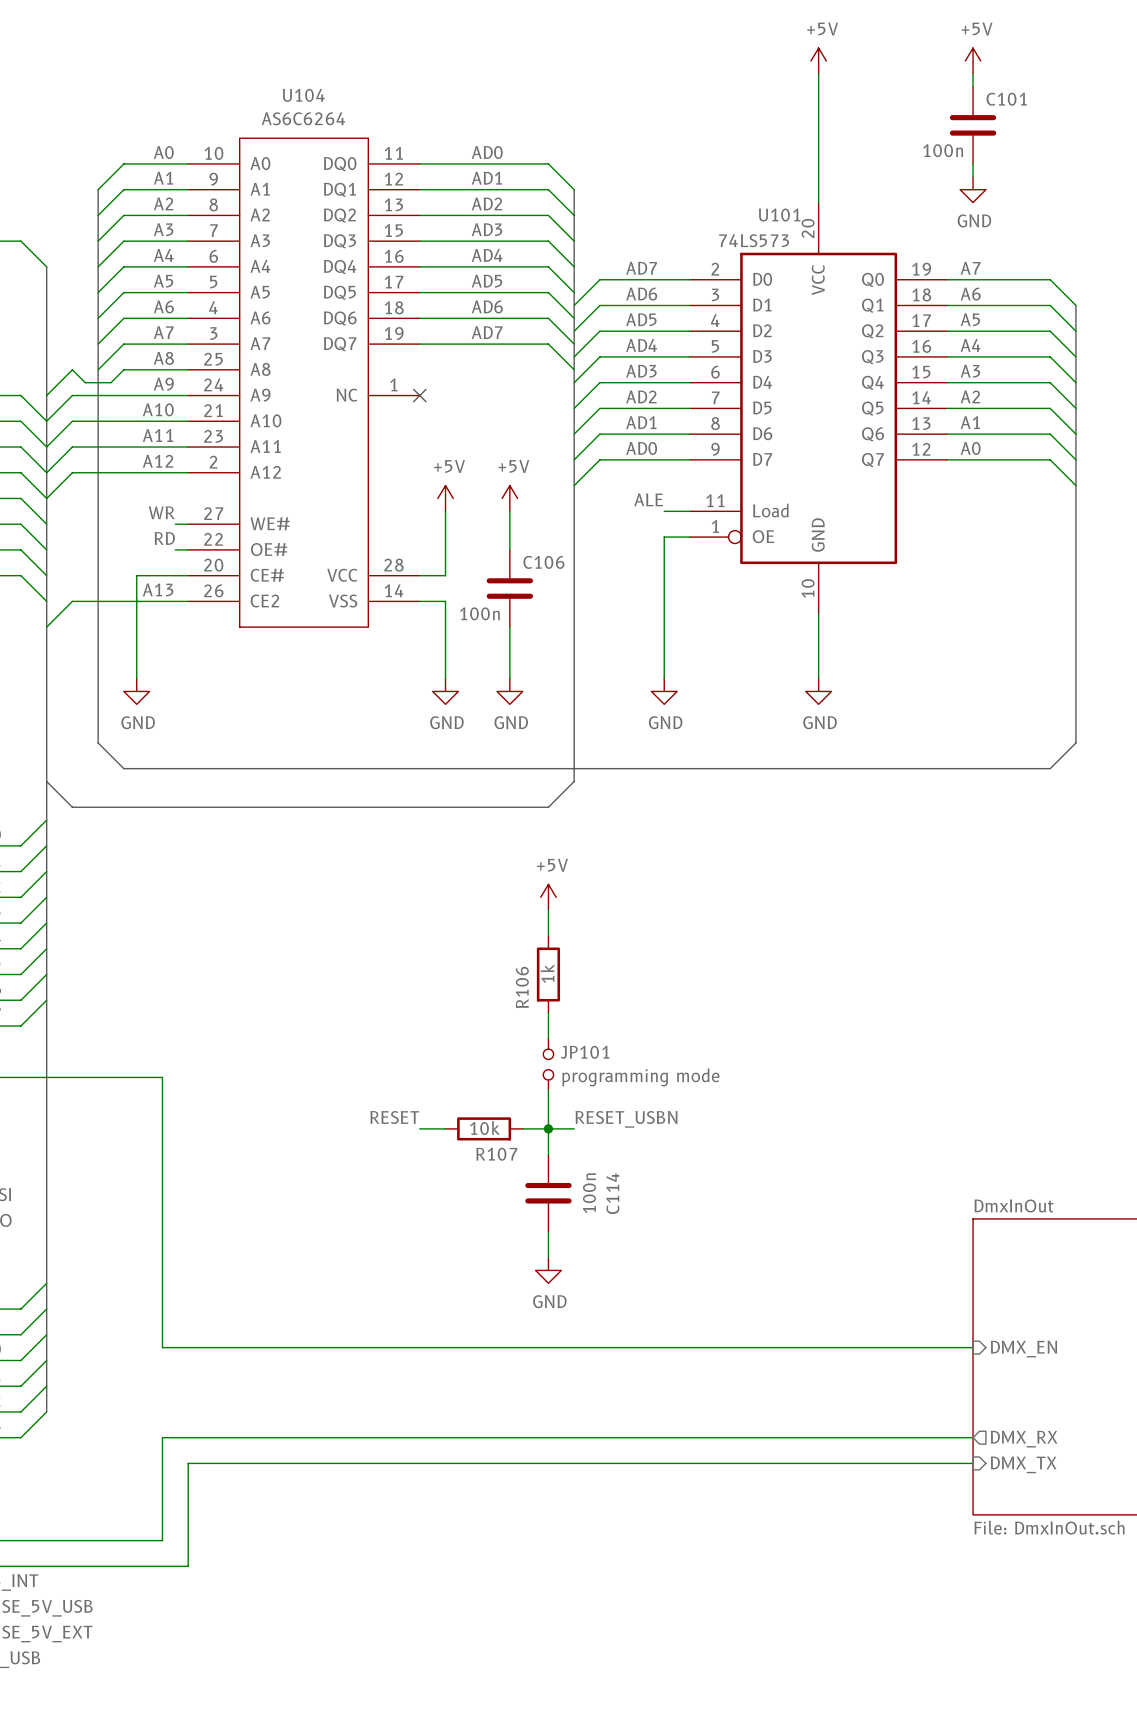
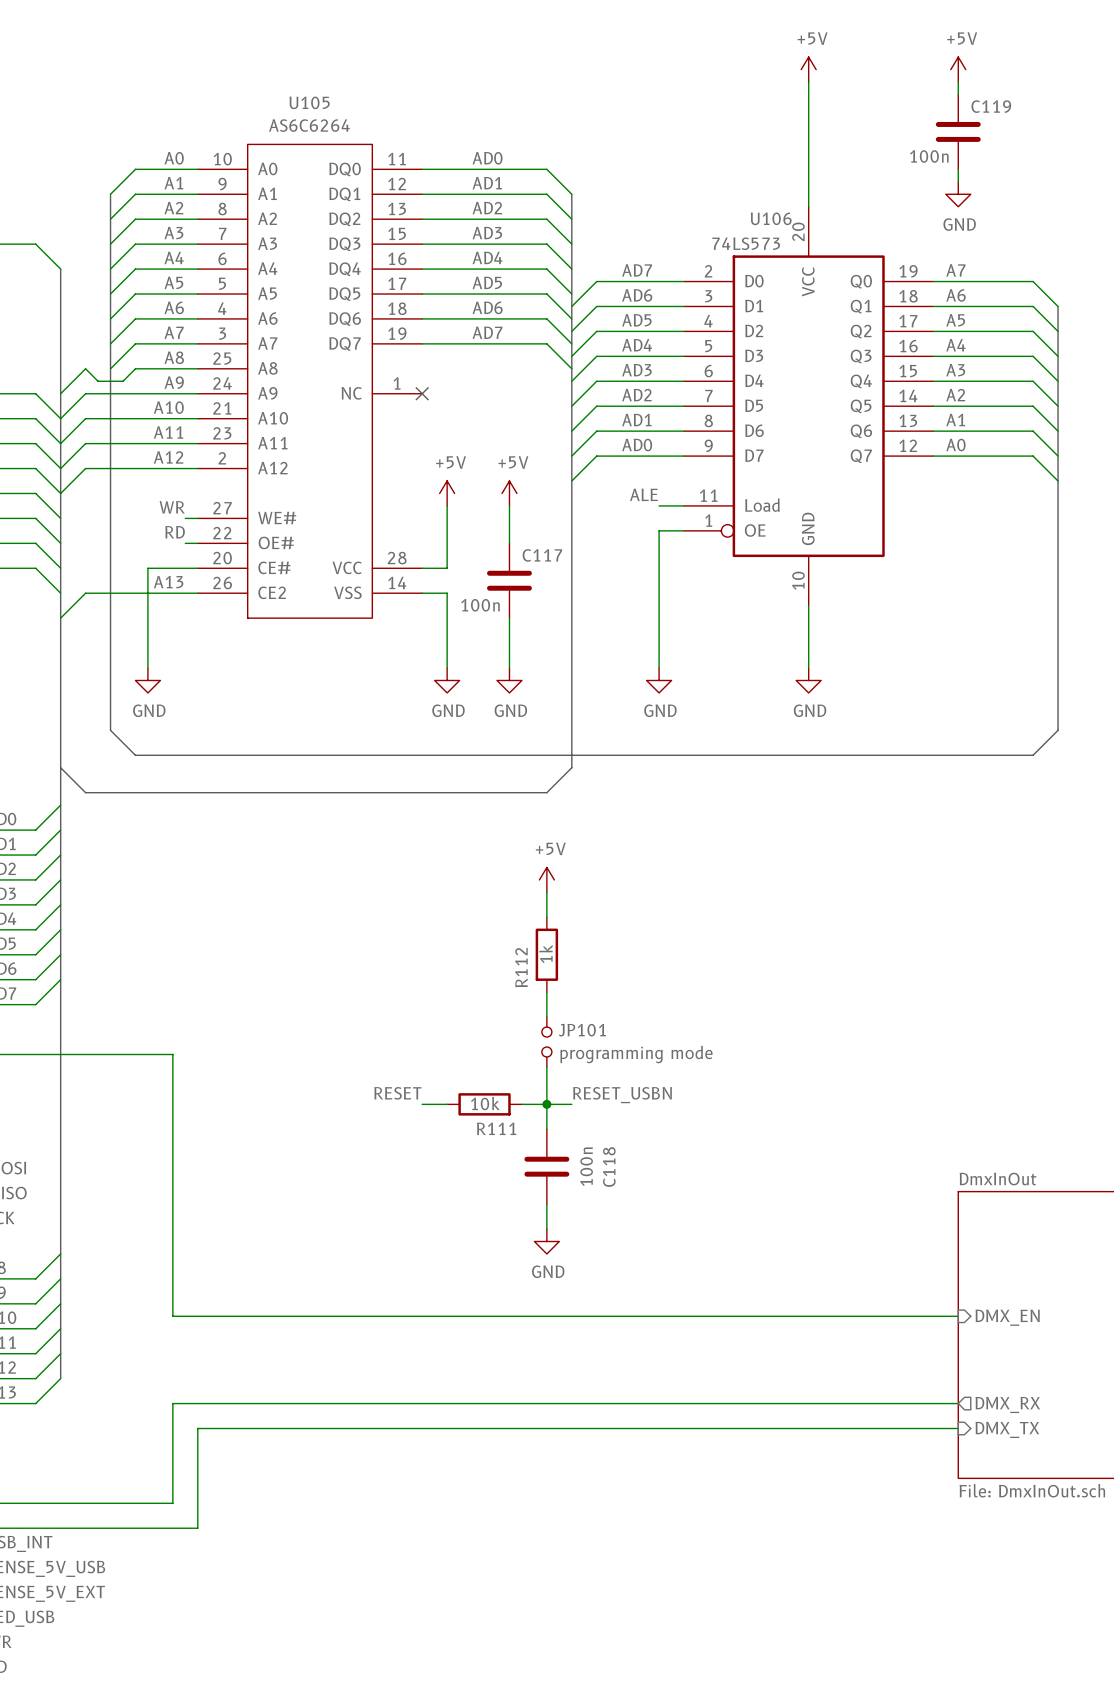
U104 name: U104 (303, 95) -> U105 (309, 102)
C101 name: C101 (1006, 99) -> C119 (991, 106)
U101 name: U101 (779, 215) -> U106 (771, 218)
C106 name: C106 (543, 562) -> C117 (542, 555)
R106 name: R106 (522, 987) -> R112 (521, 967)
R107 name: R107 (496, 1154) -> R111 (496, 1128)
C114 name: C114 (612, 1193) -> C118 (609, 1167)

